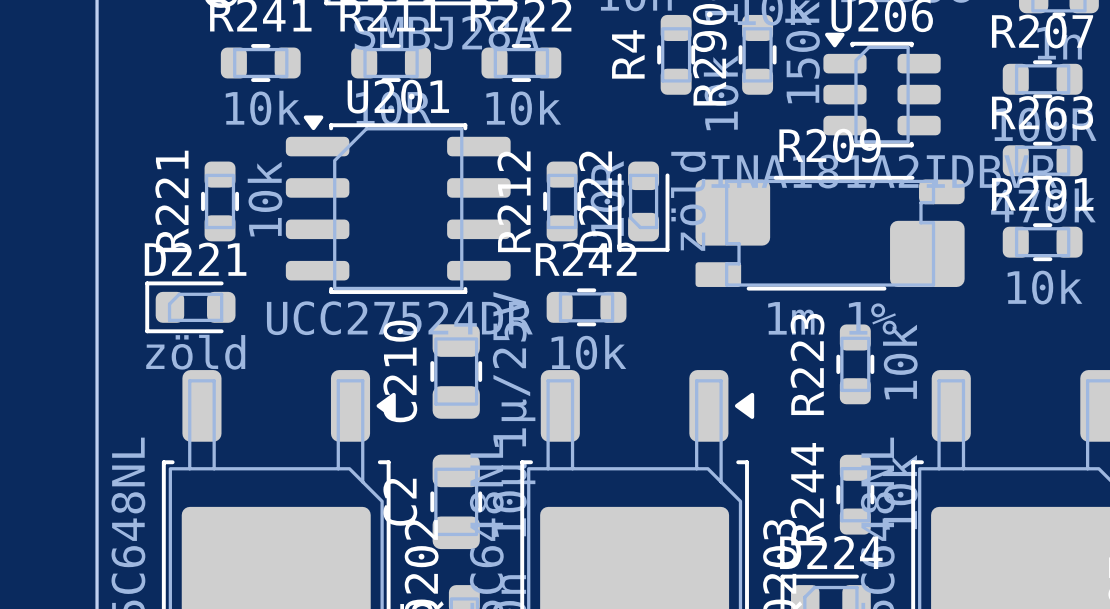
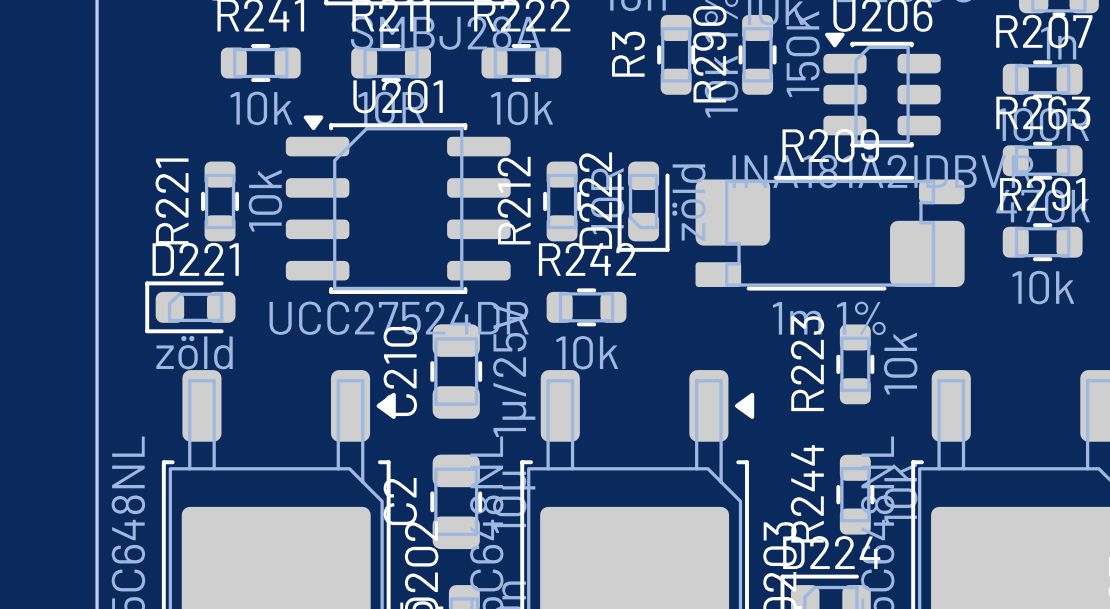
R4 name: R4 (628, 54) -> R3 (628, 54)

